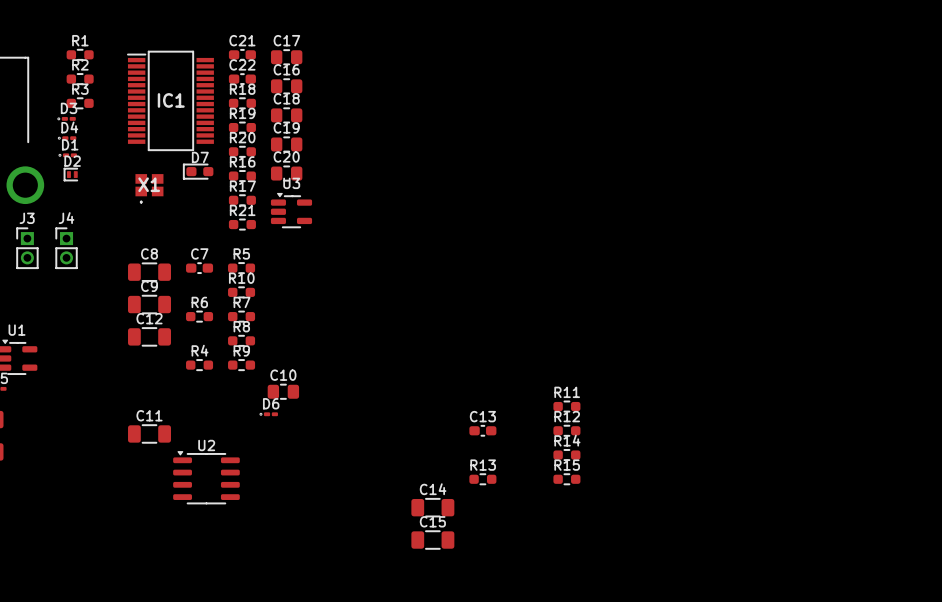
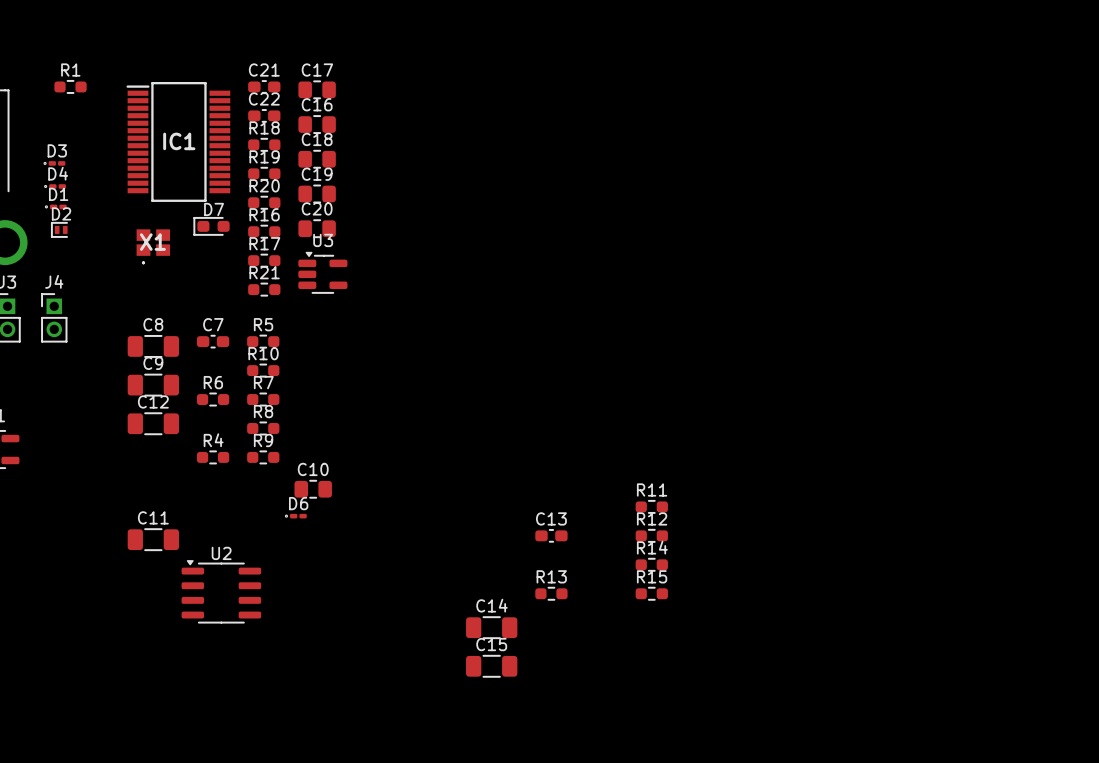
R2: (80, 79) -> none
R3: (80, 103) -> none

